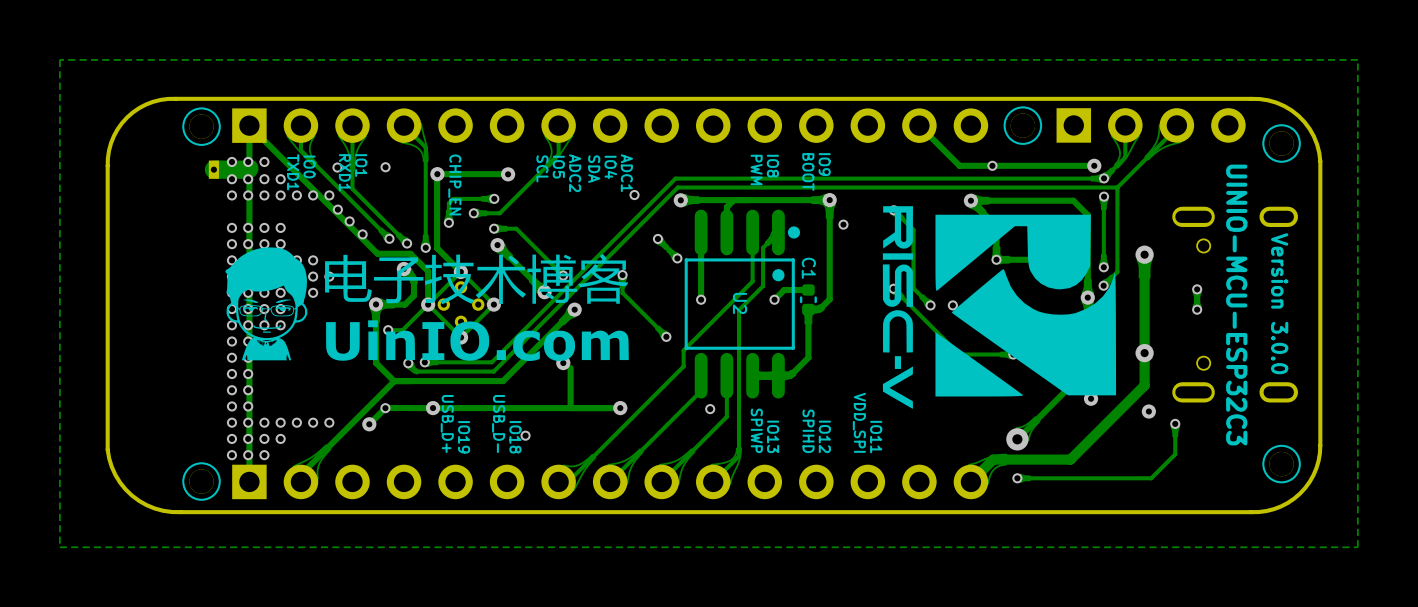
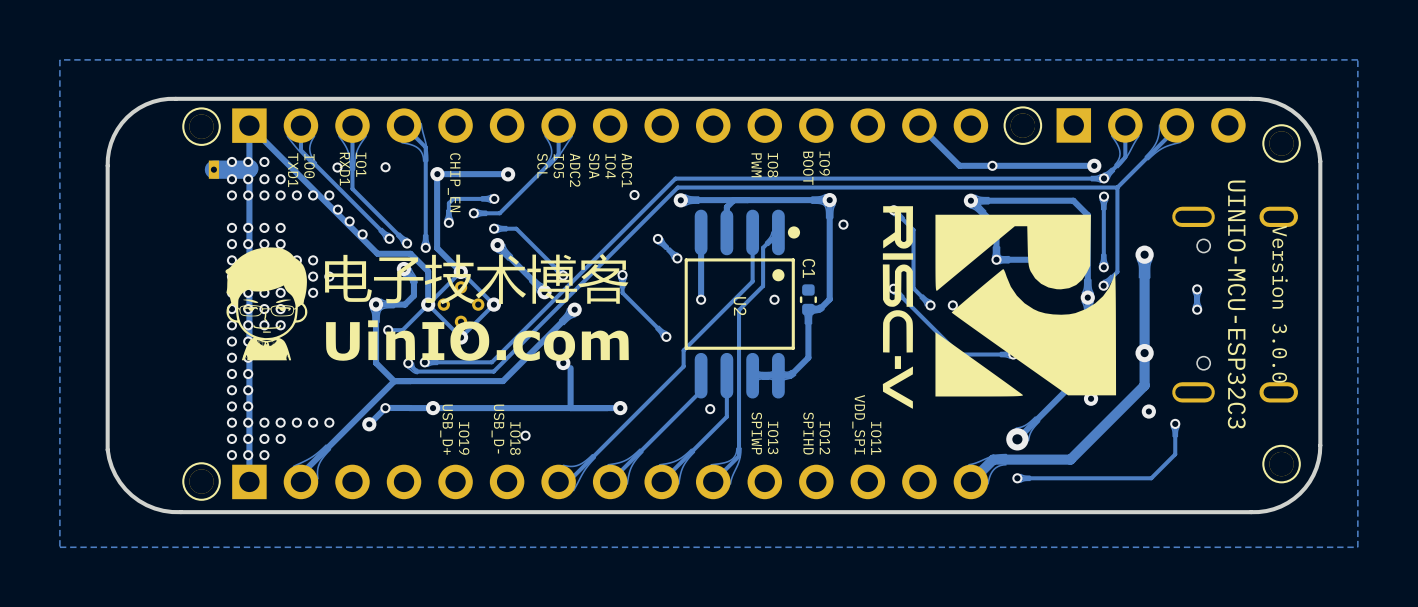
track: (808, 289) (784, 289) (774, 299) -> none

